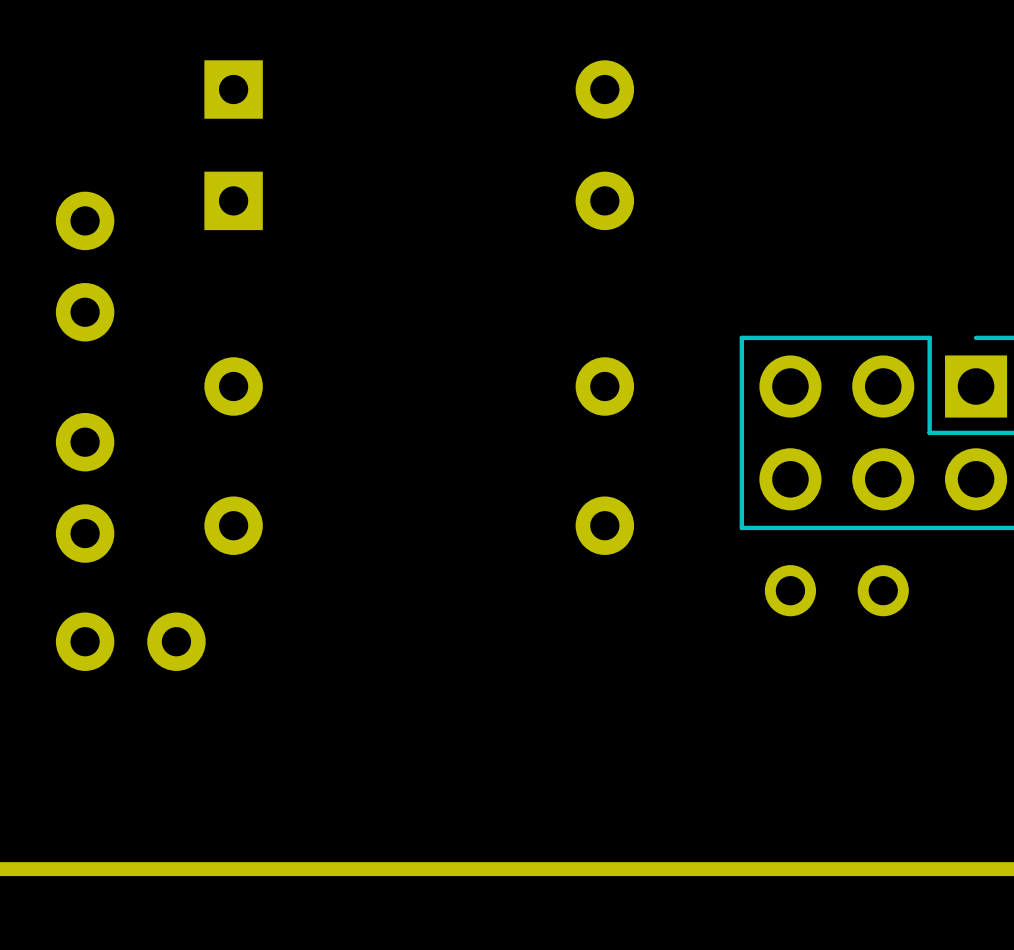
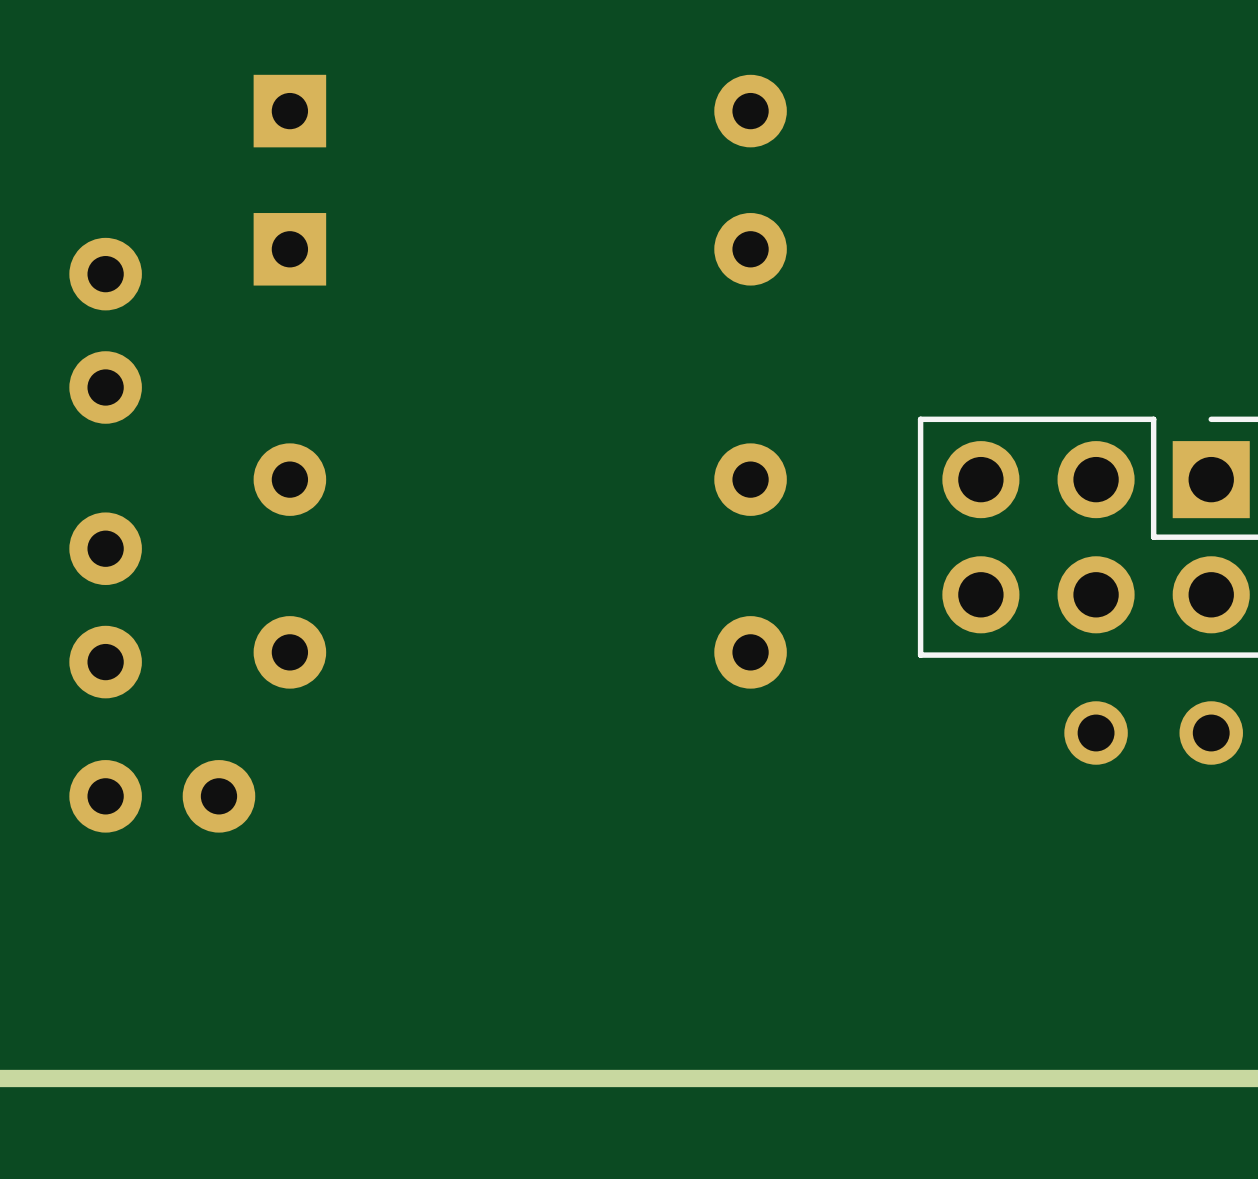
part: (836, 590) -> none
part: none -> (1153, 732)

